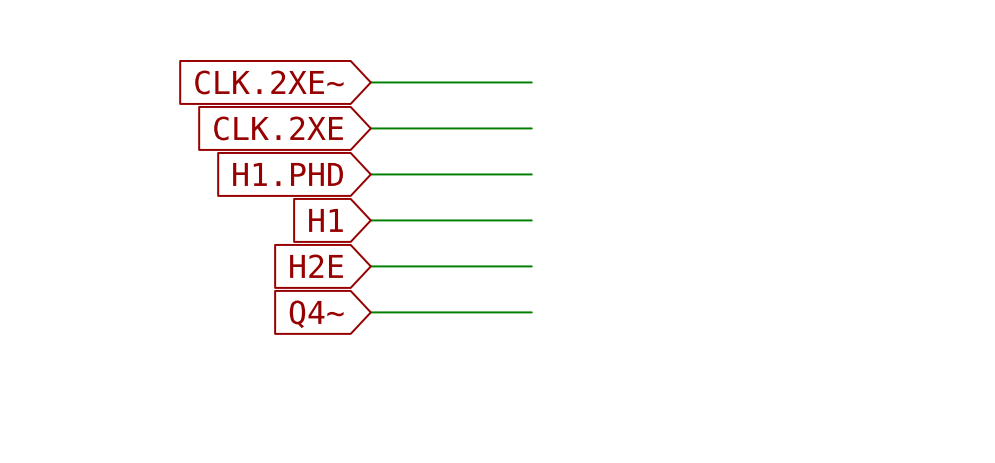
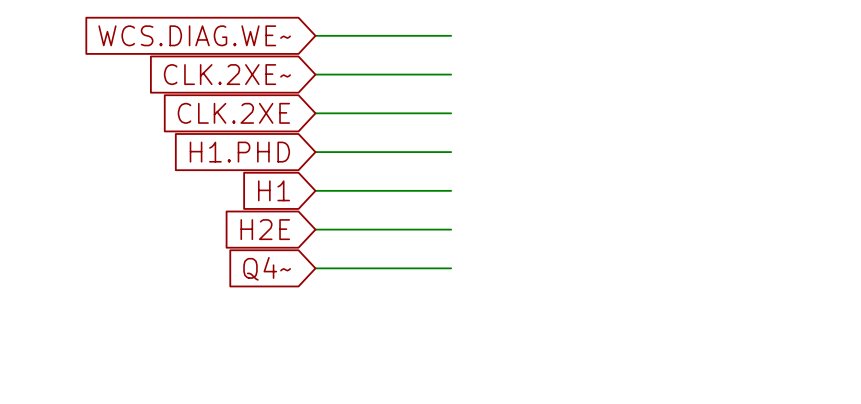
global label: none -> WCS.DIAG.WE~ (194, 35)
wire: none -> (315, 35) (451, 35)

